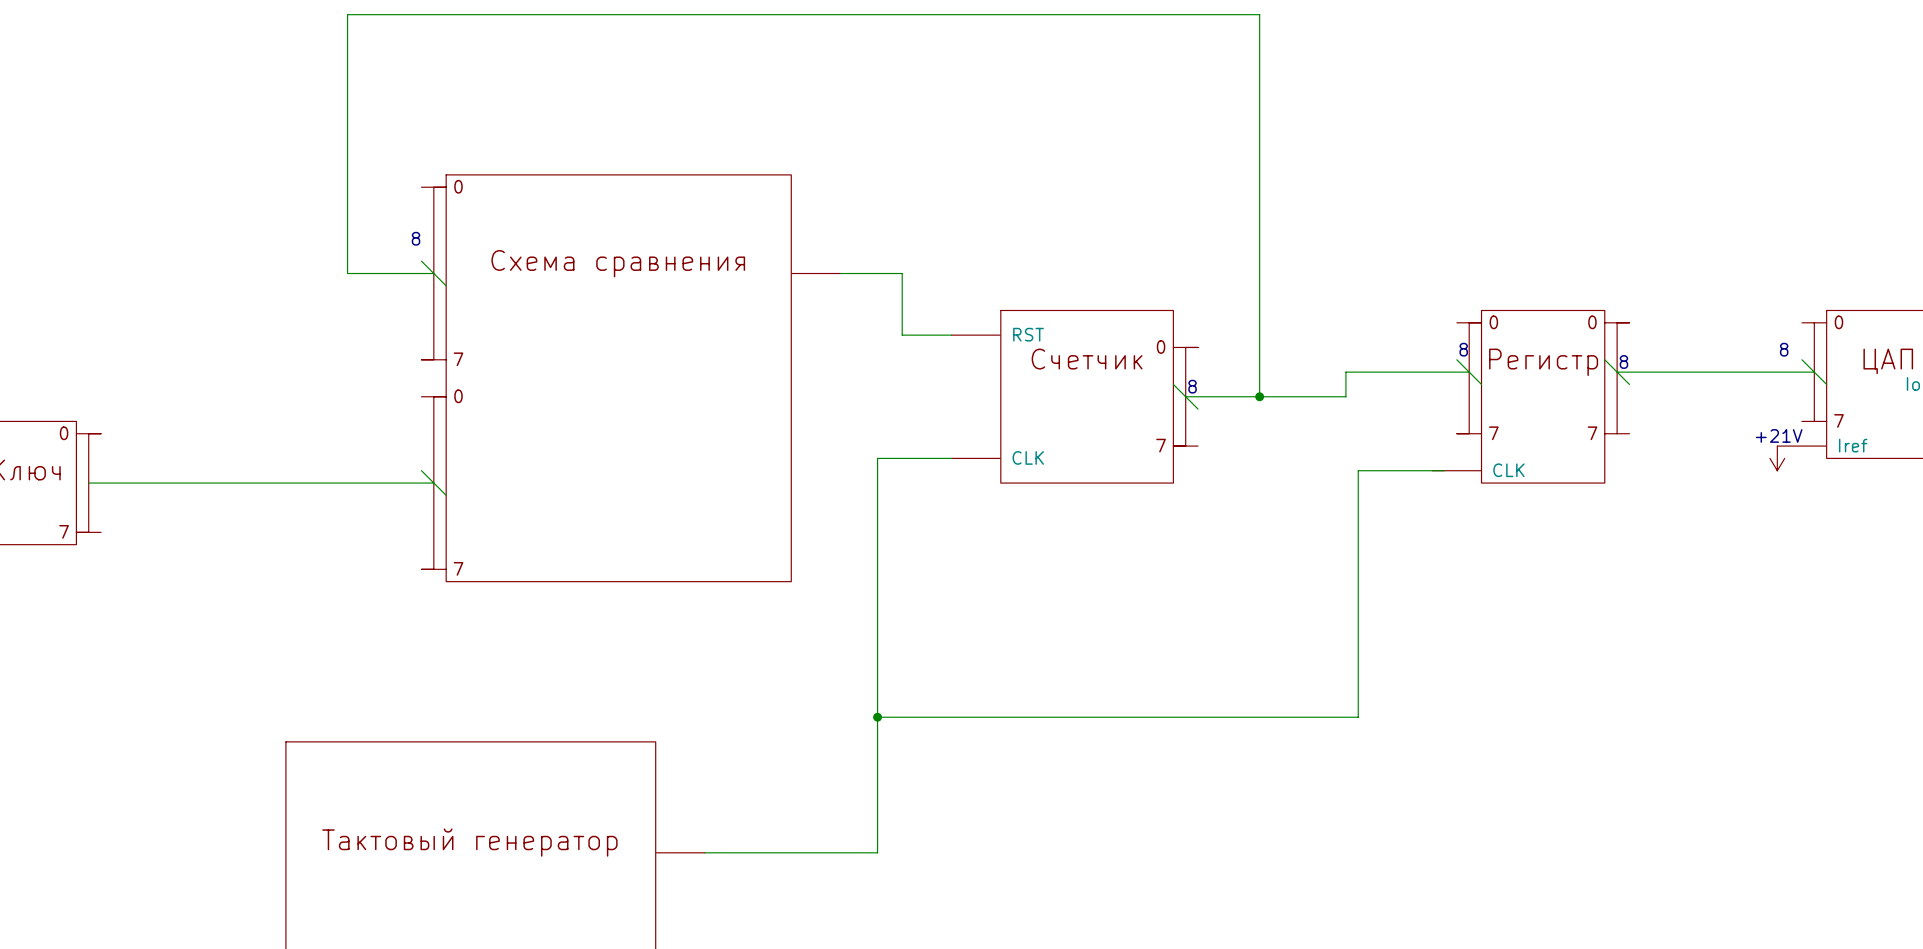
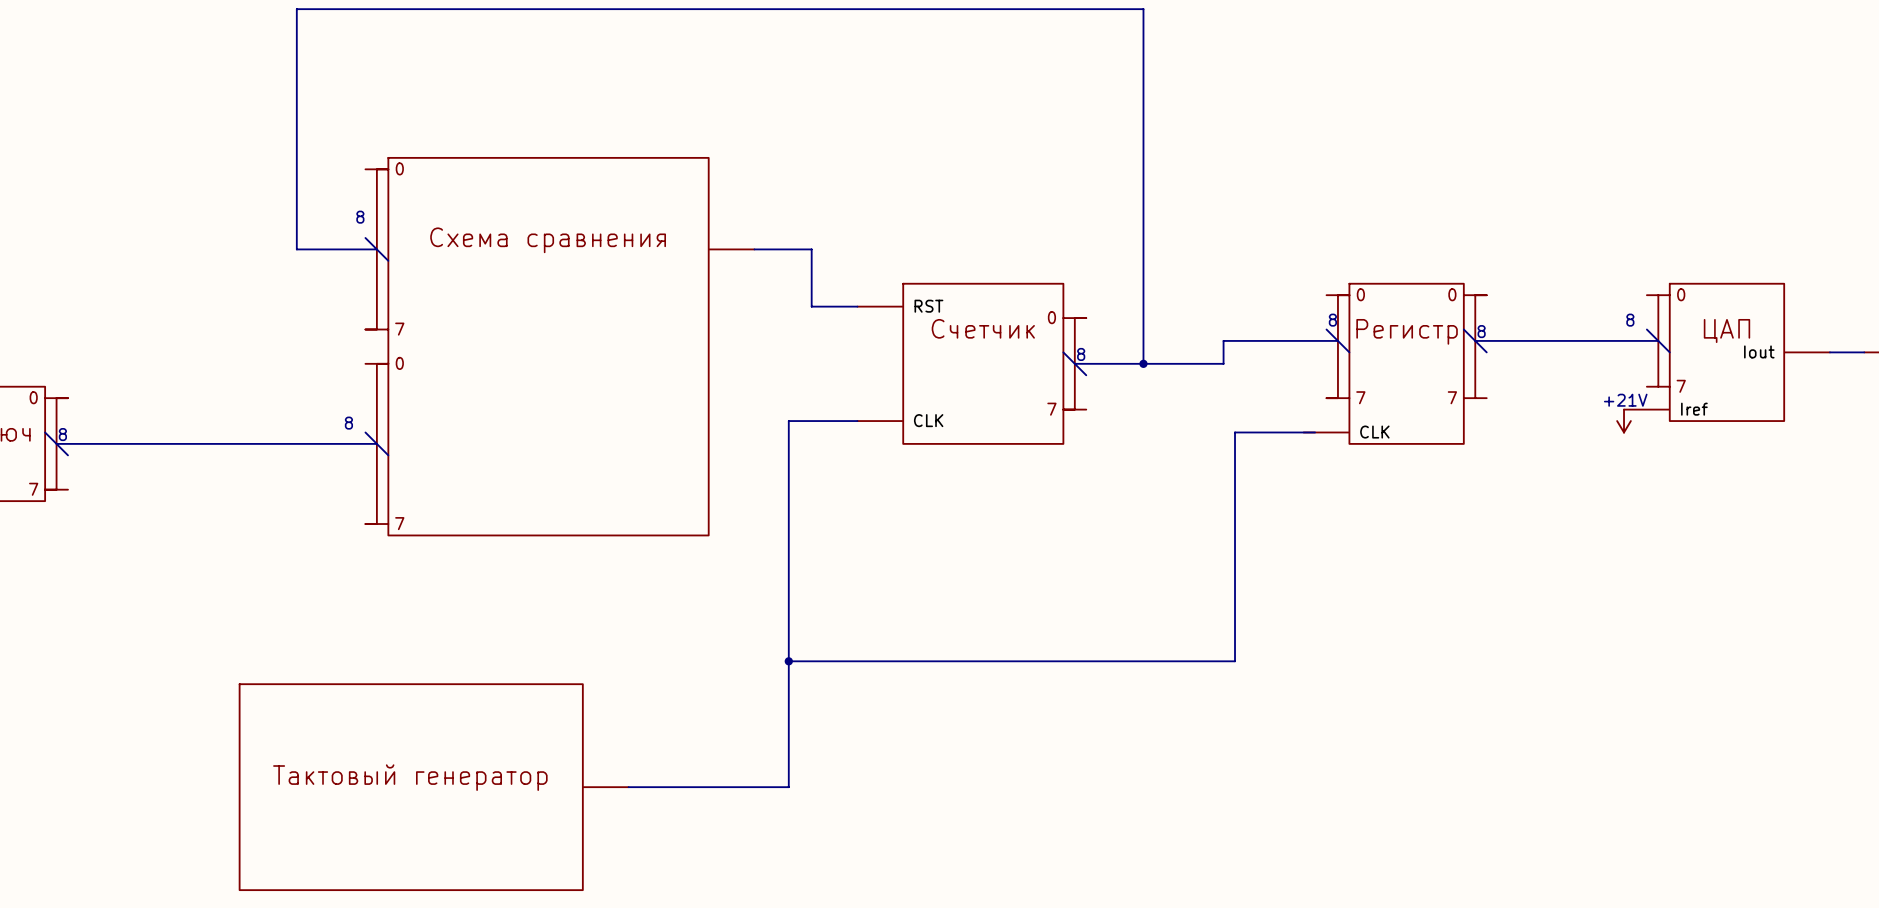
text: none -> 8 (348, 423)
wire: none -> (45, 432) (67, 455)
text: none -> 8 (62, 434)

